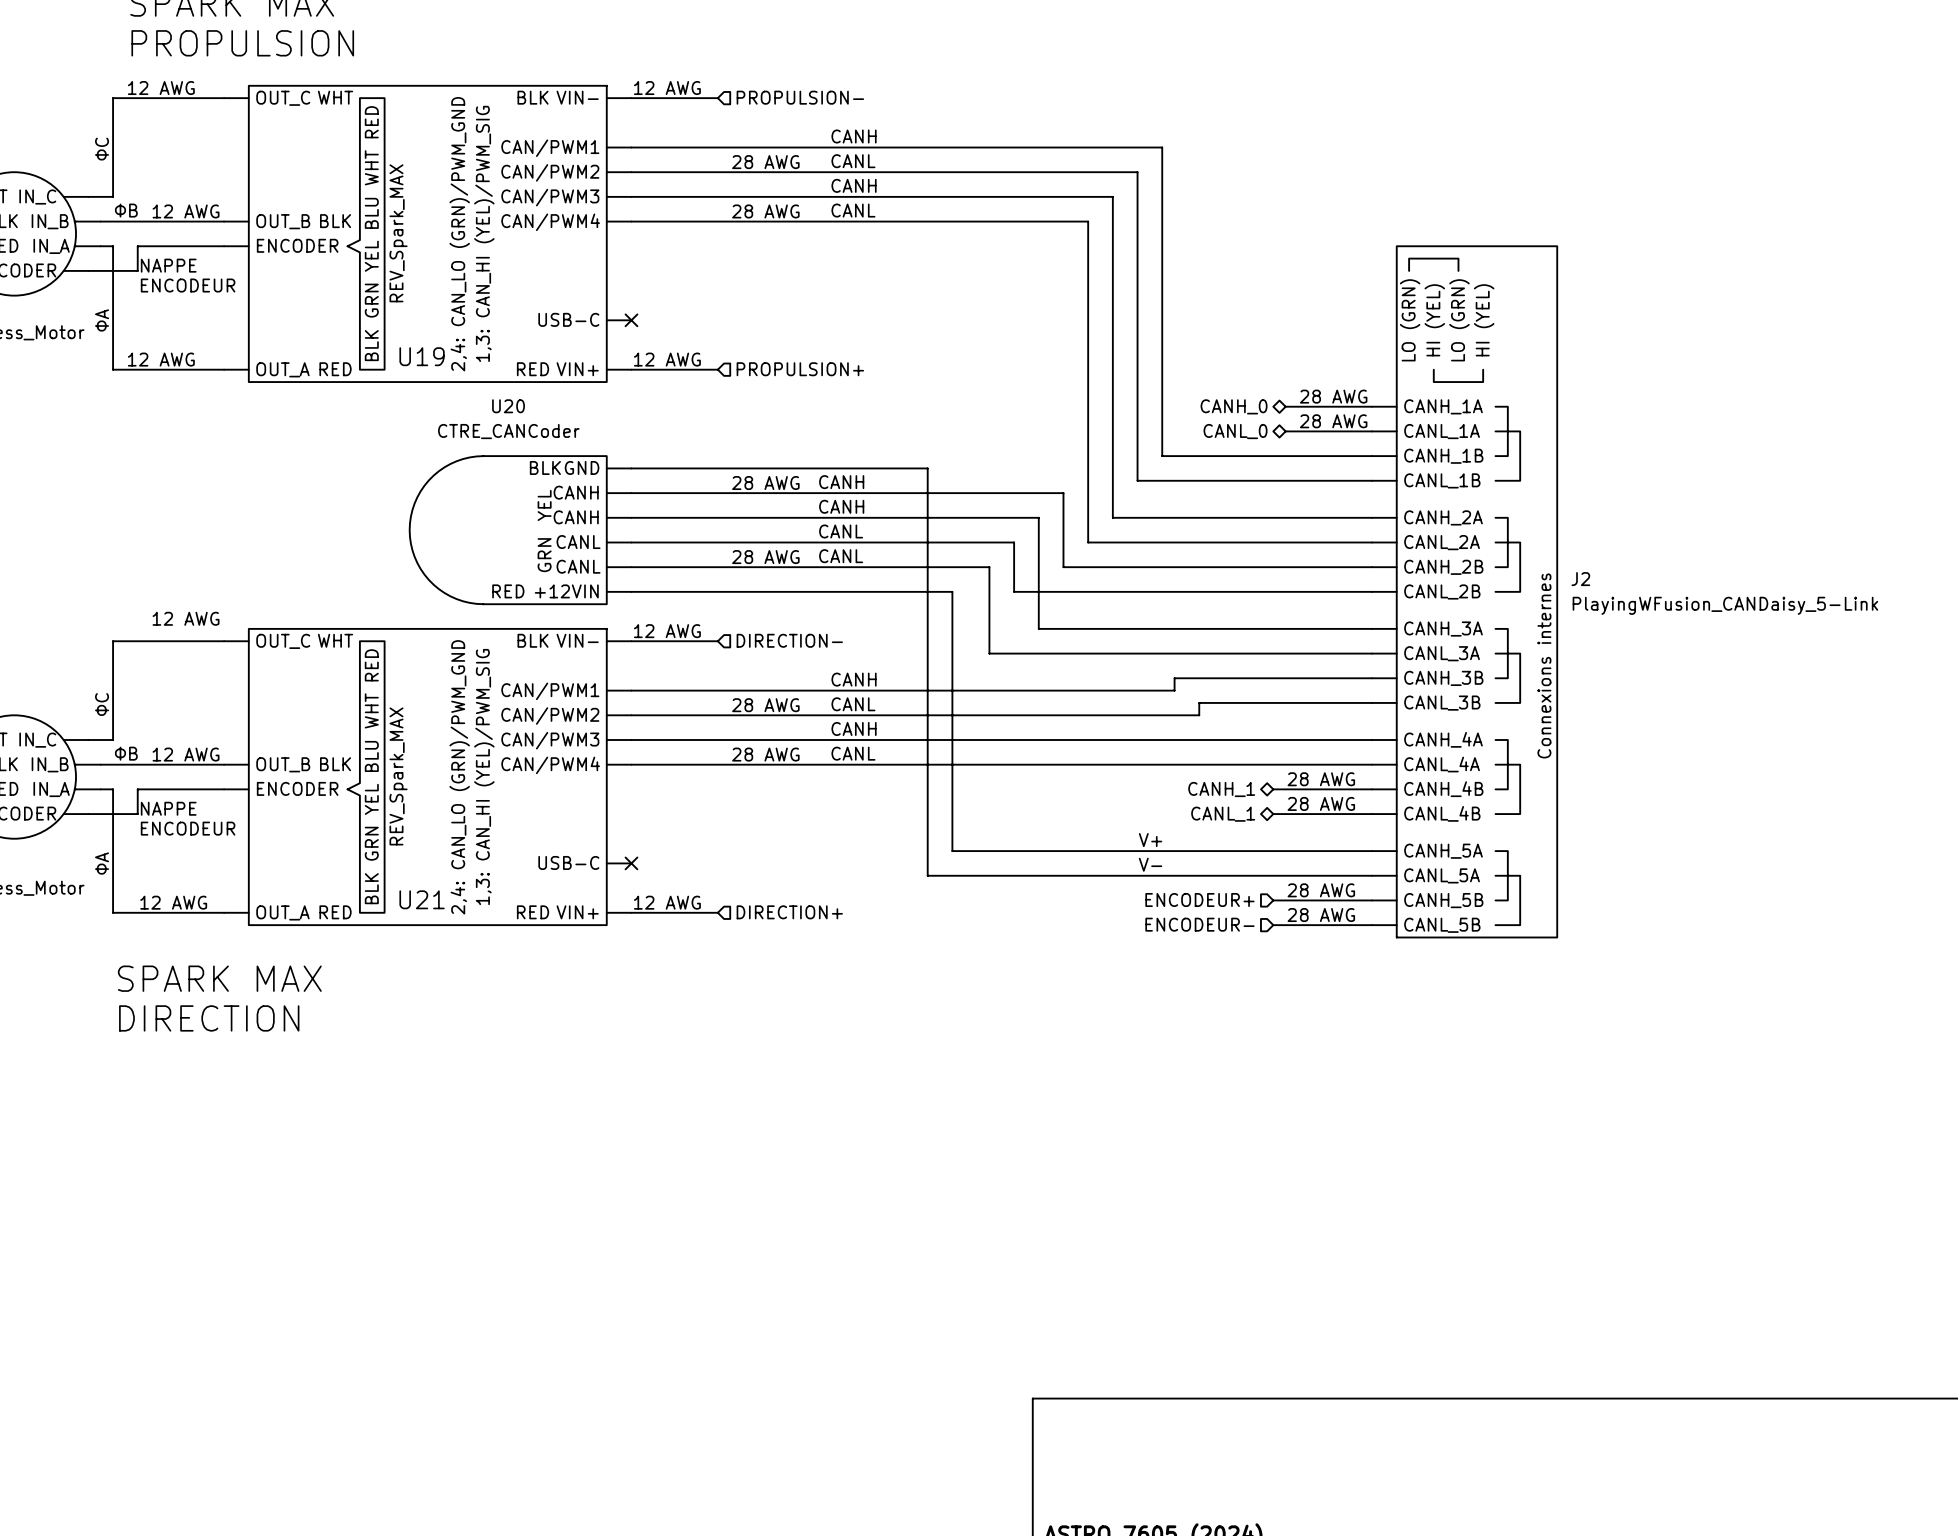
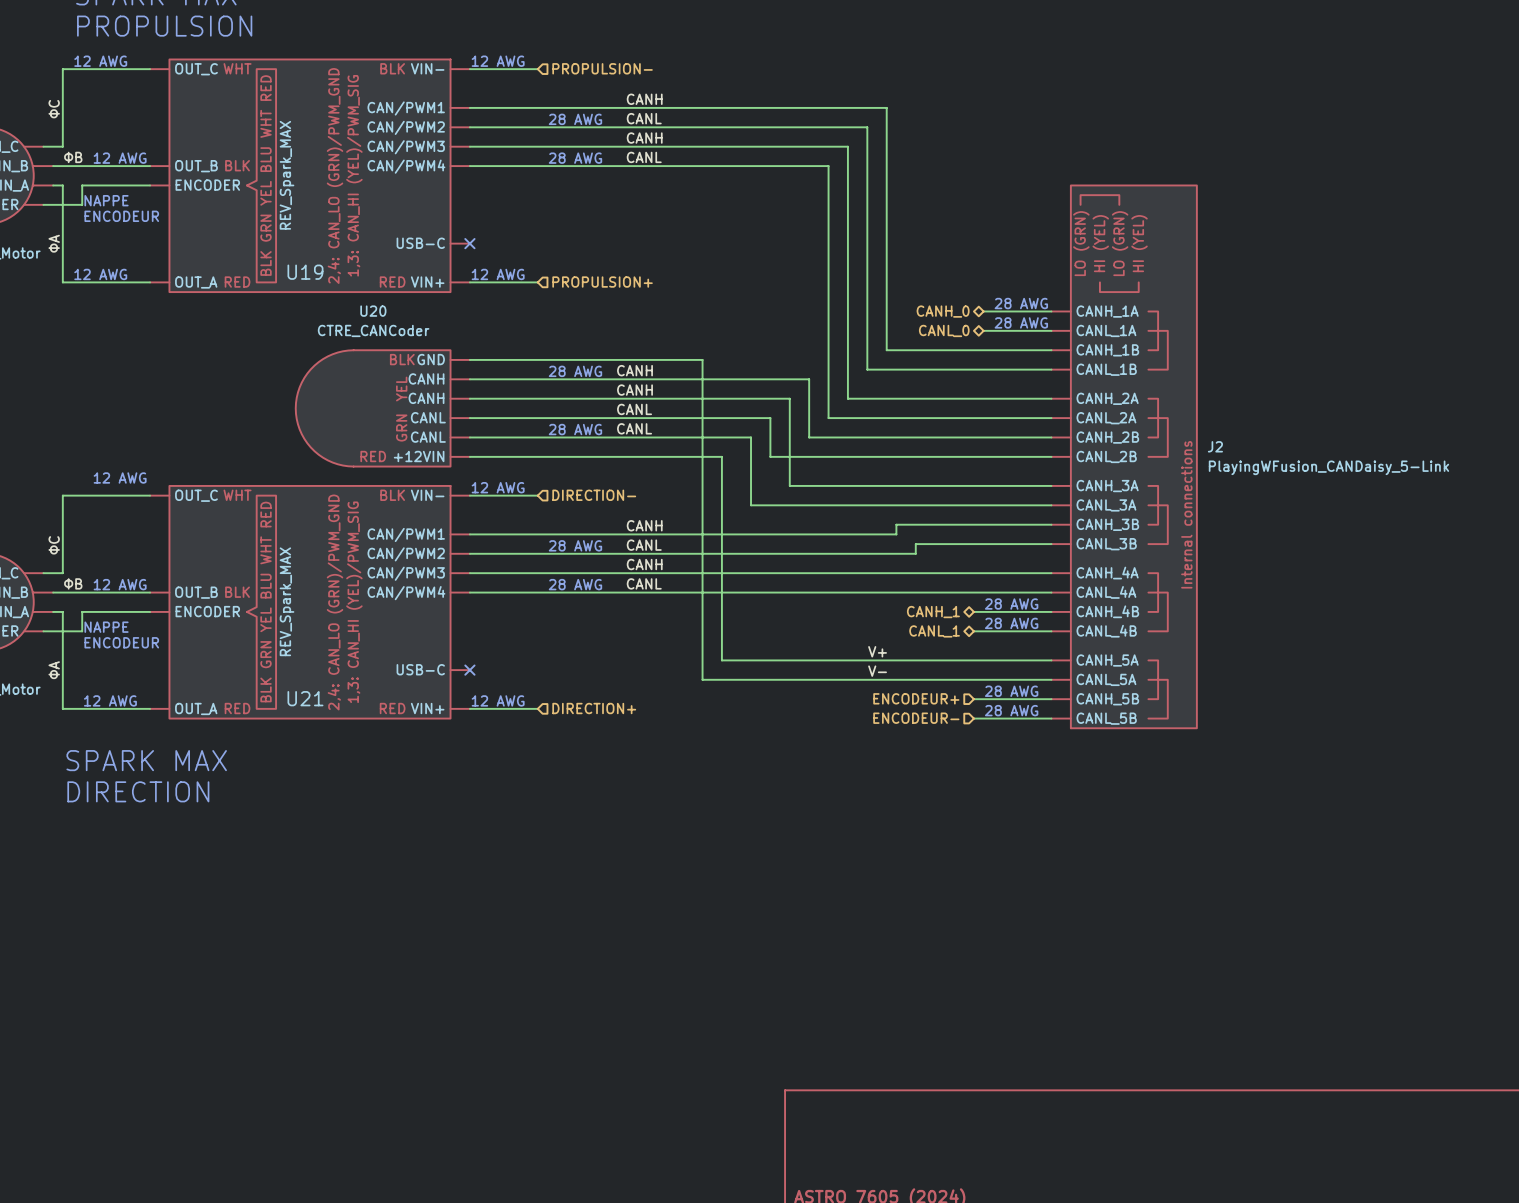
J2 text: Connexions internes (1544, 665) -> Internal connections (1186, 514)

